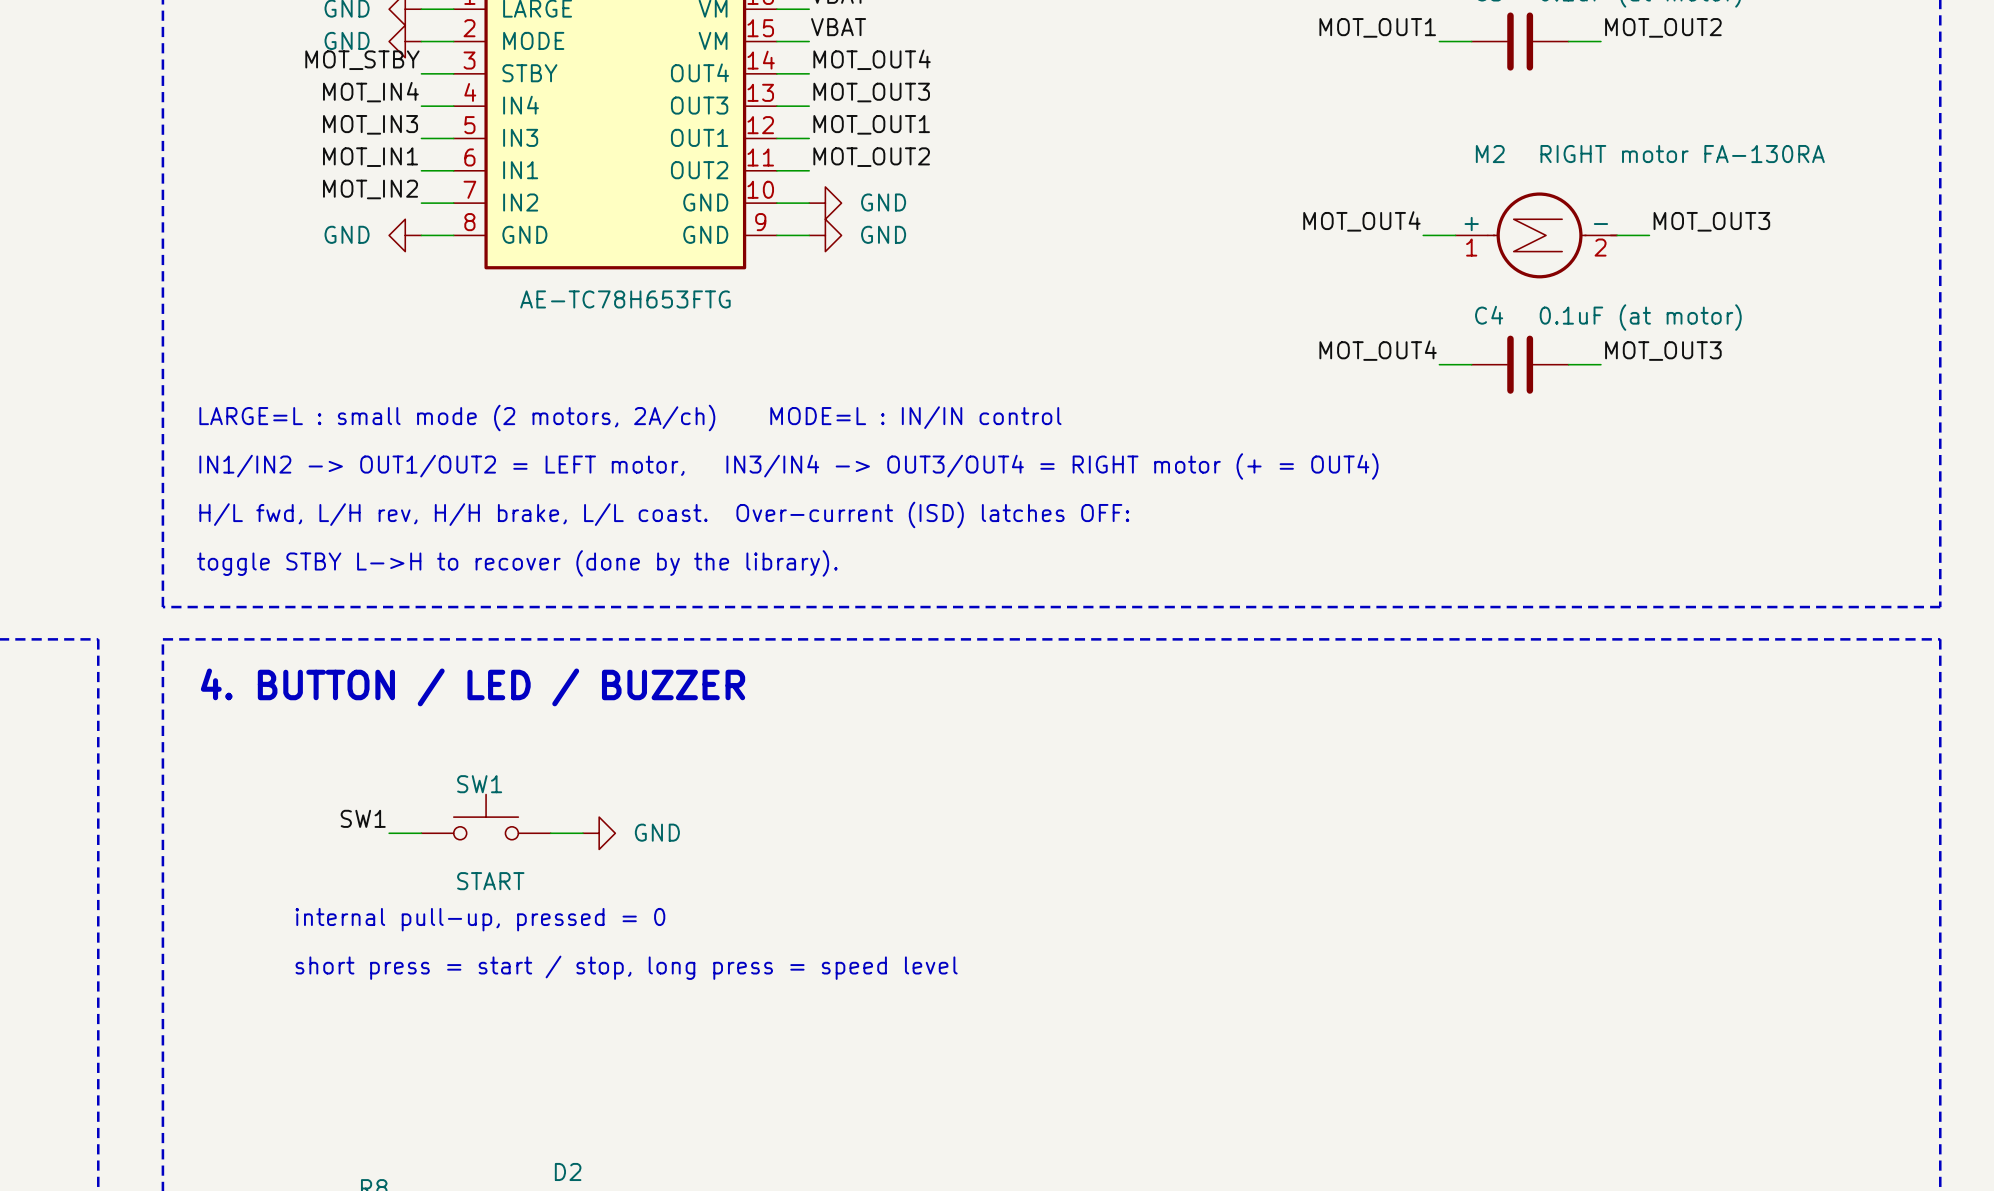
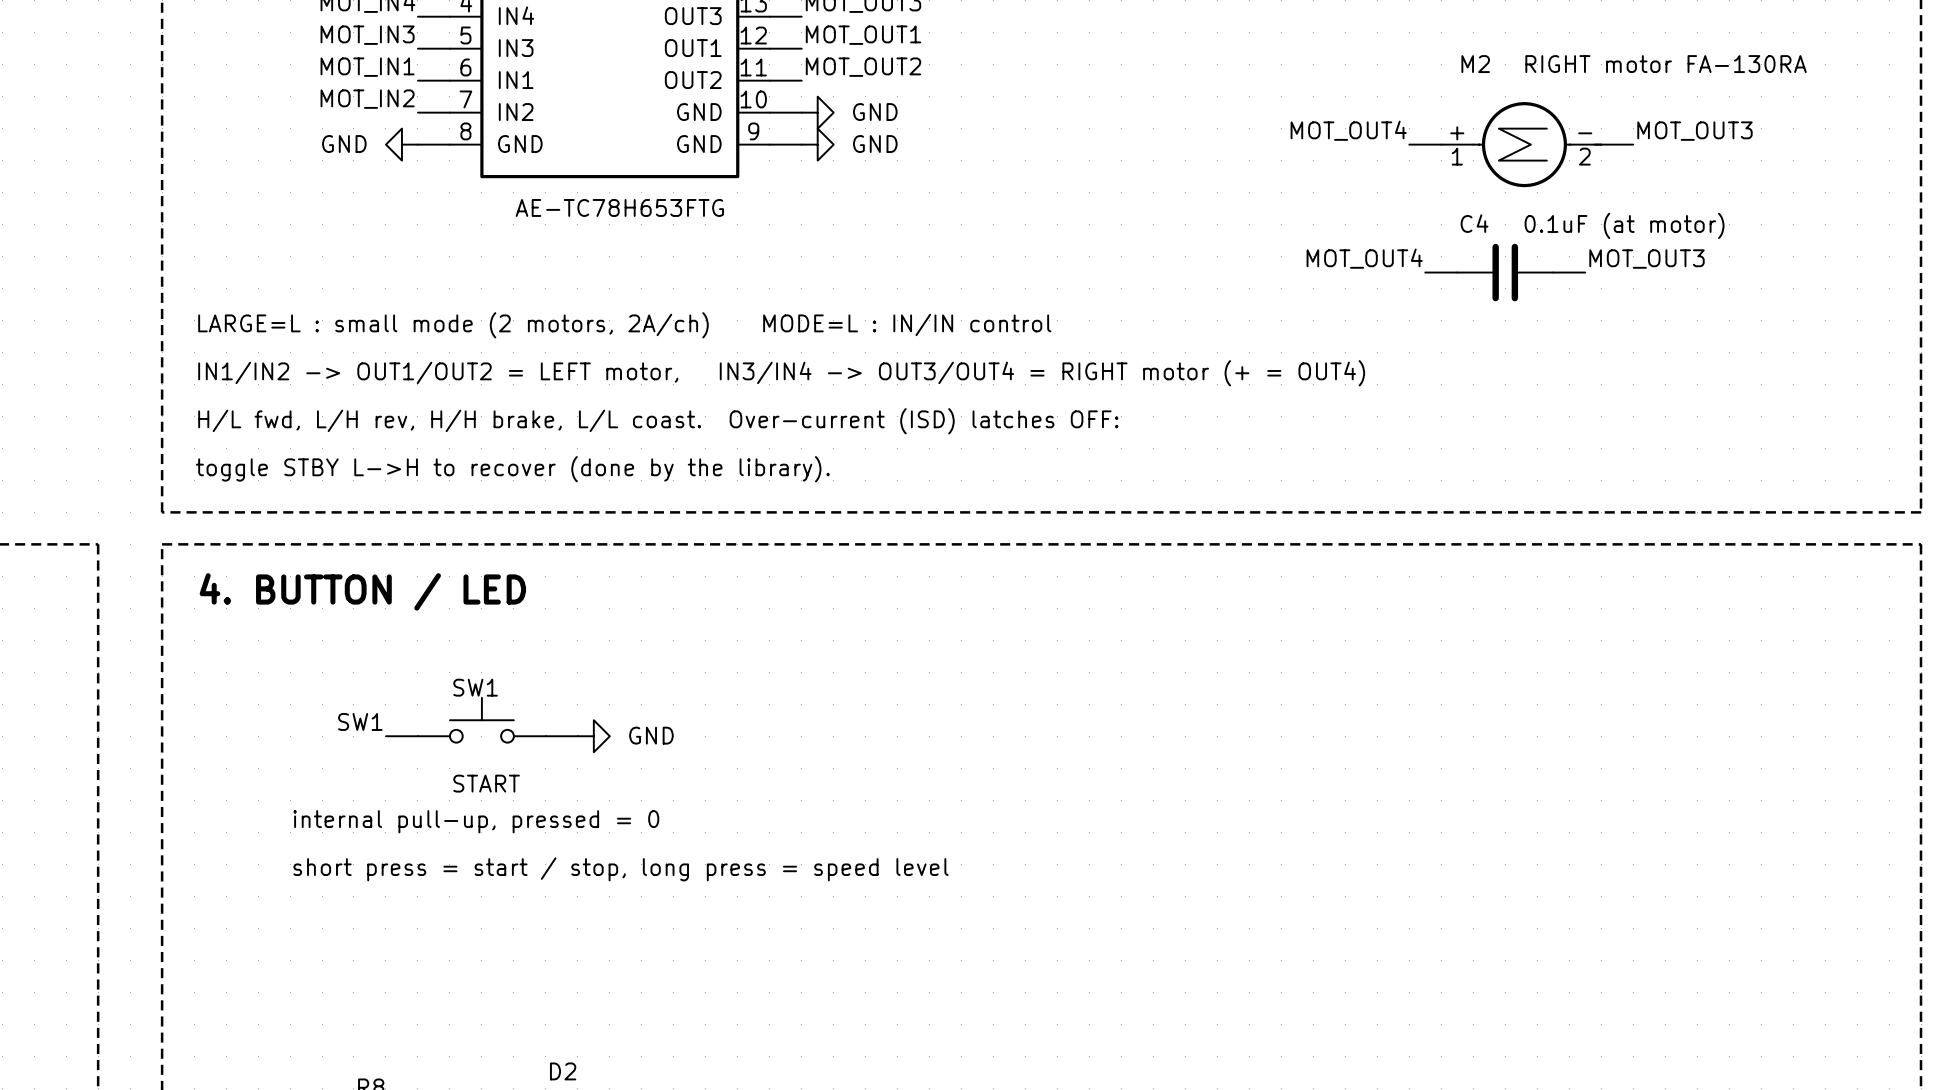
text: 4. BUTTON / LED / BUZZER (473, 687) -> 4. BUTTON / LED (362, 591)

